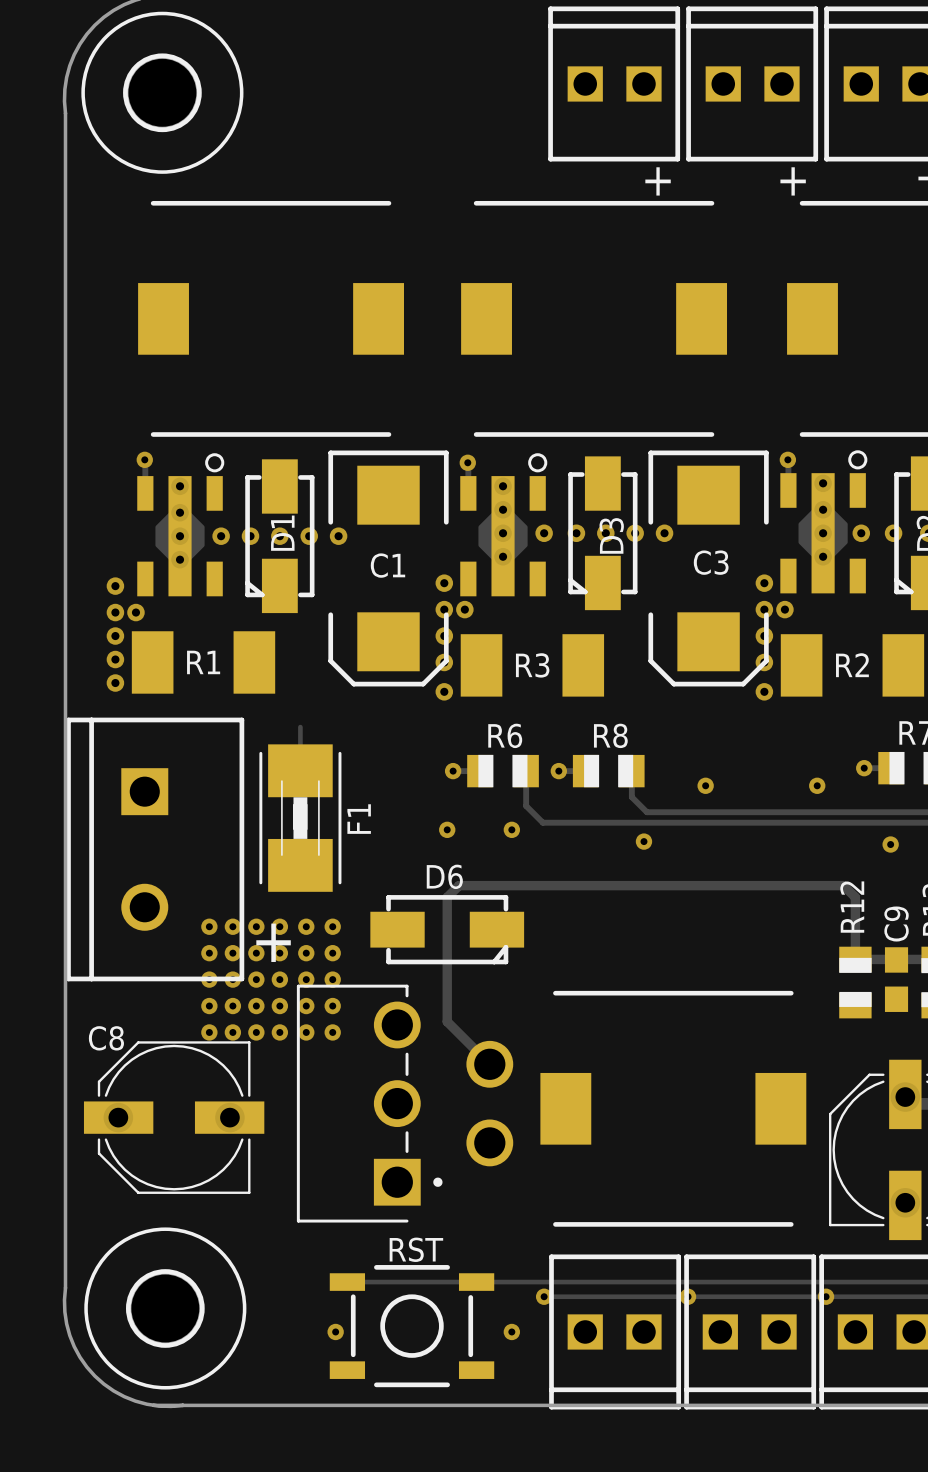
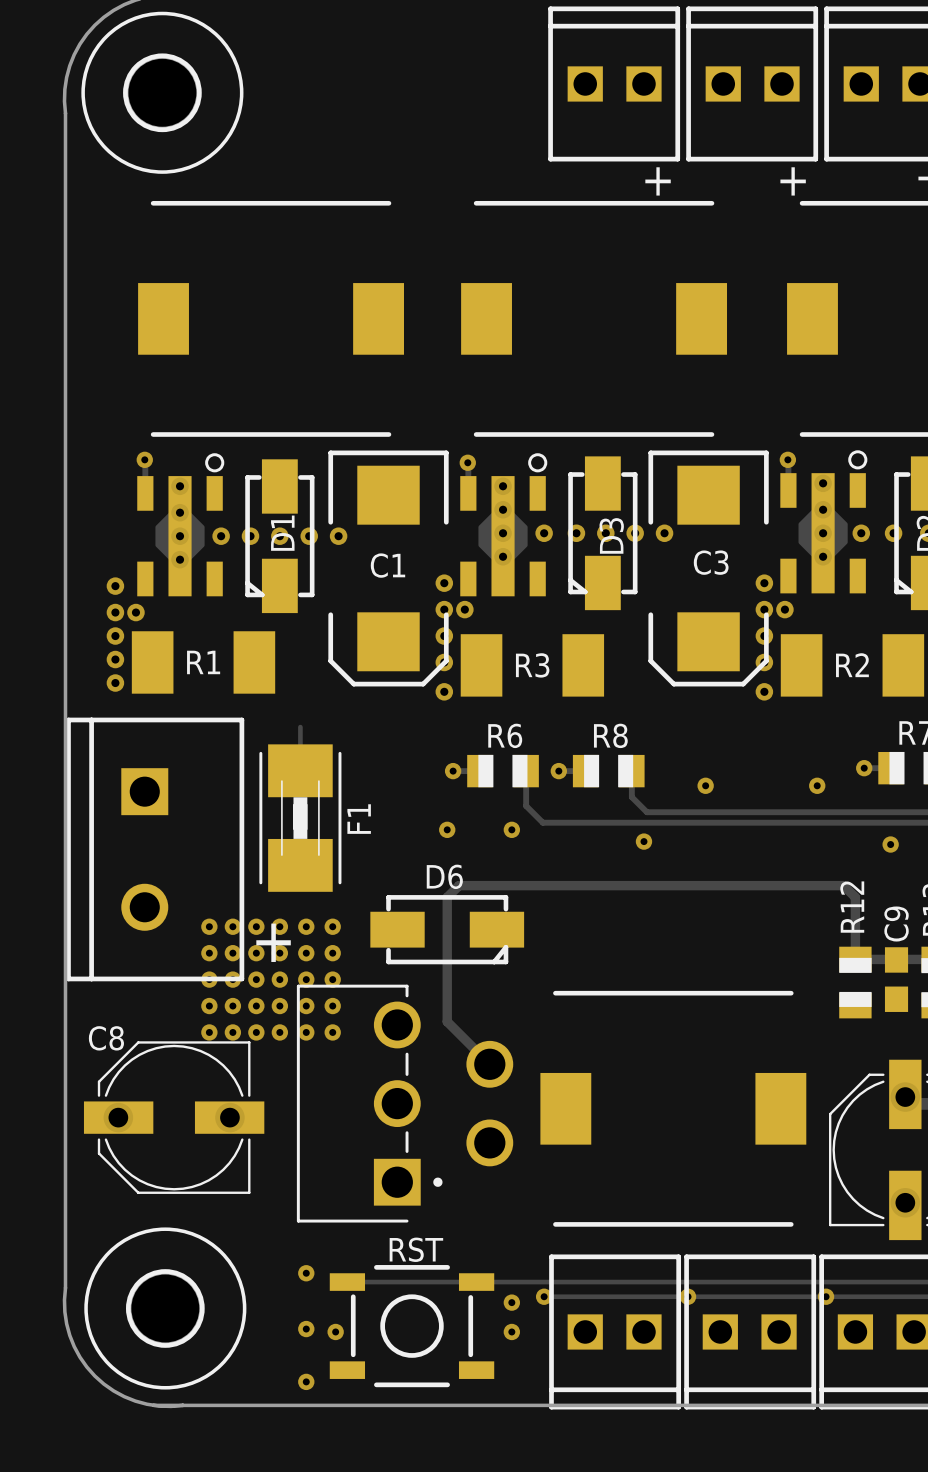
via: none -> (306, 1273)
via: none -> (511, 1302)
via: none -> (306, 1329)
via: none -> (306, 1381)

